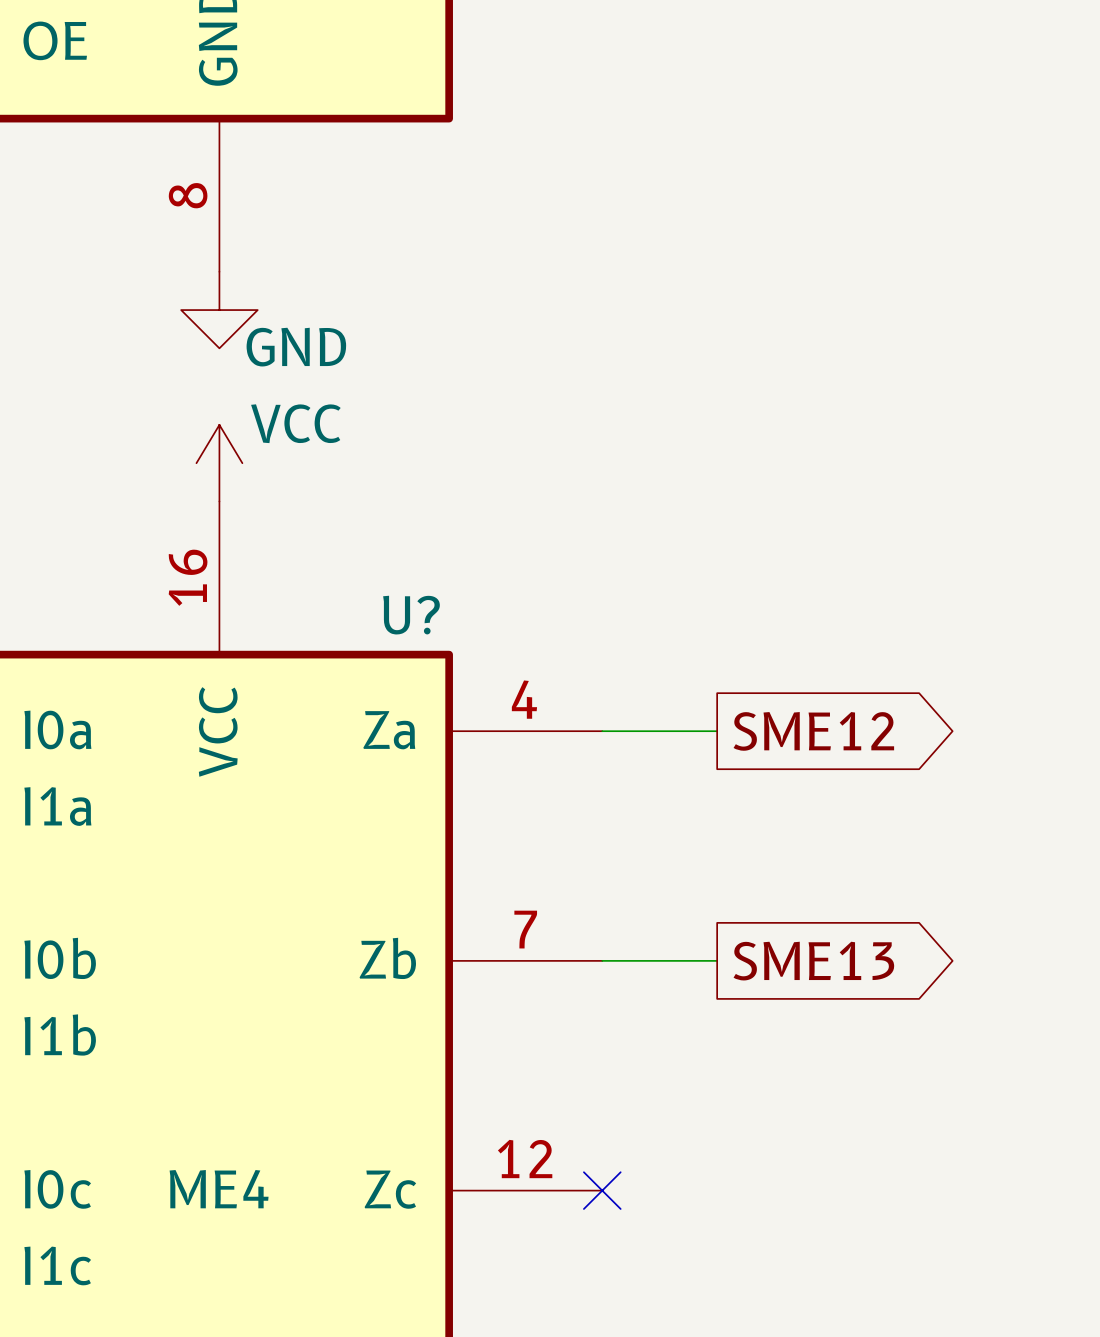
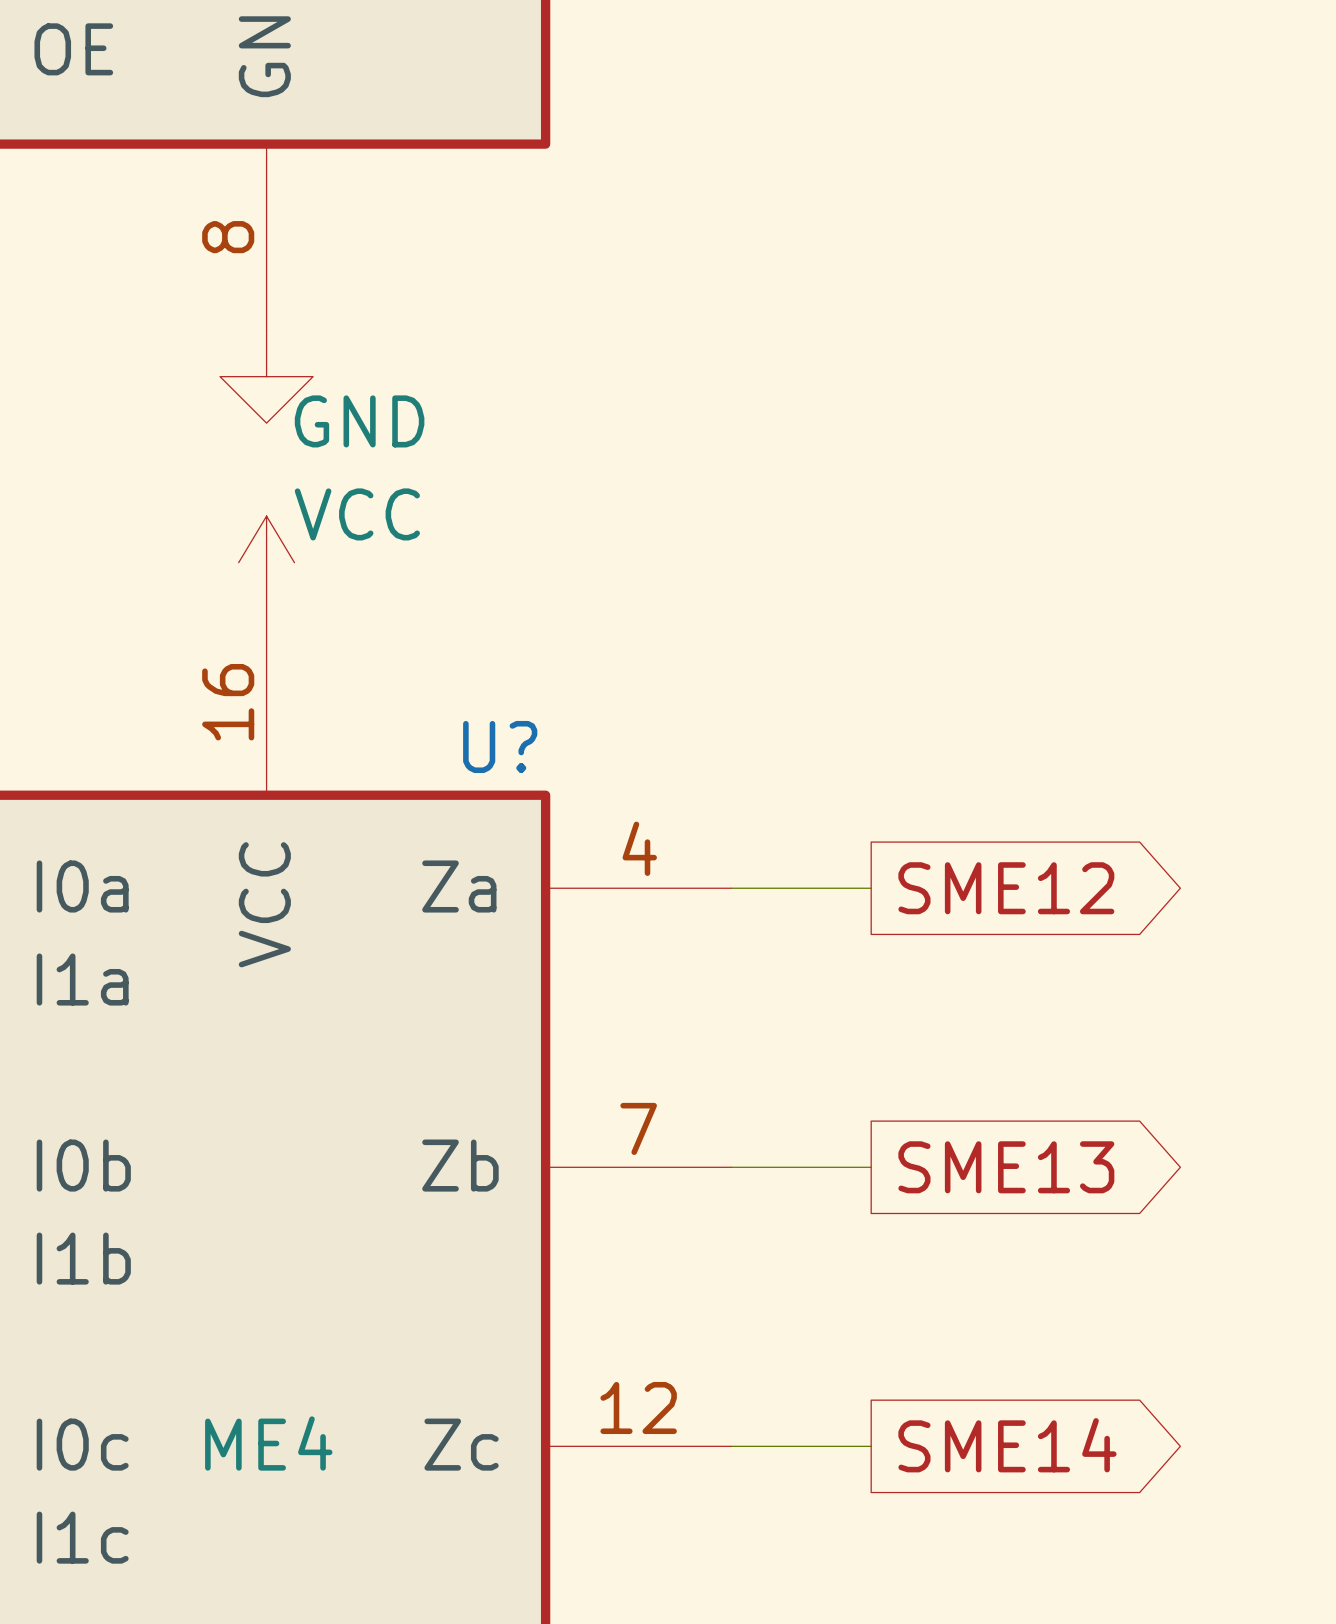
wire: none -> (731, 1446) (871, 1446)
no-connect mark: (602, 1190) -> none
global label: none -> SME14 (1007, 1445)

